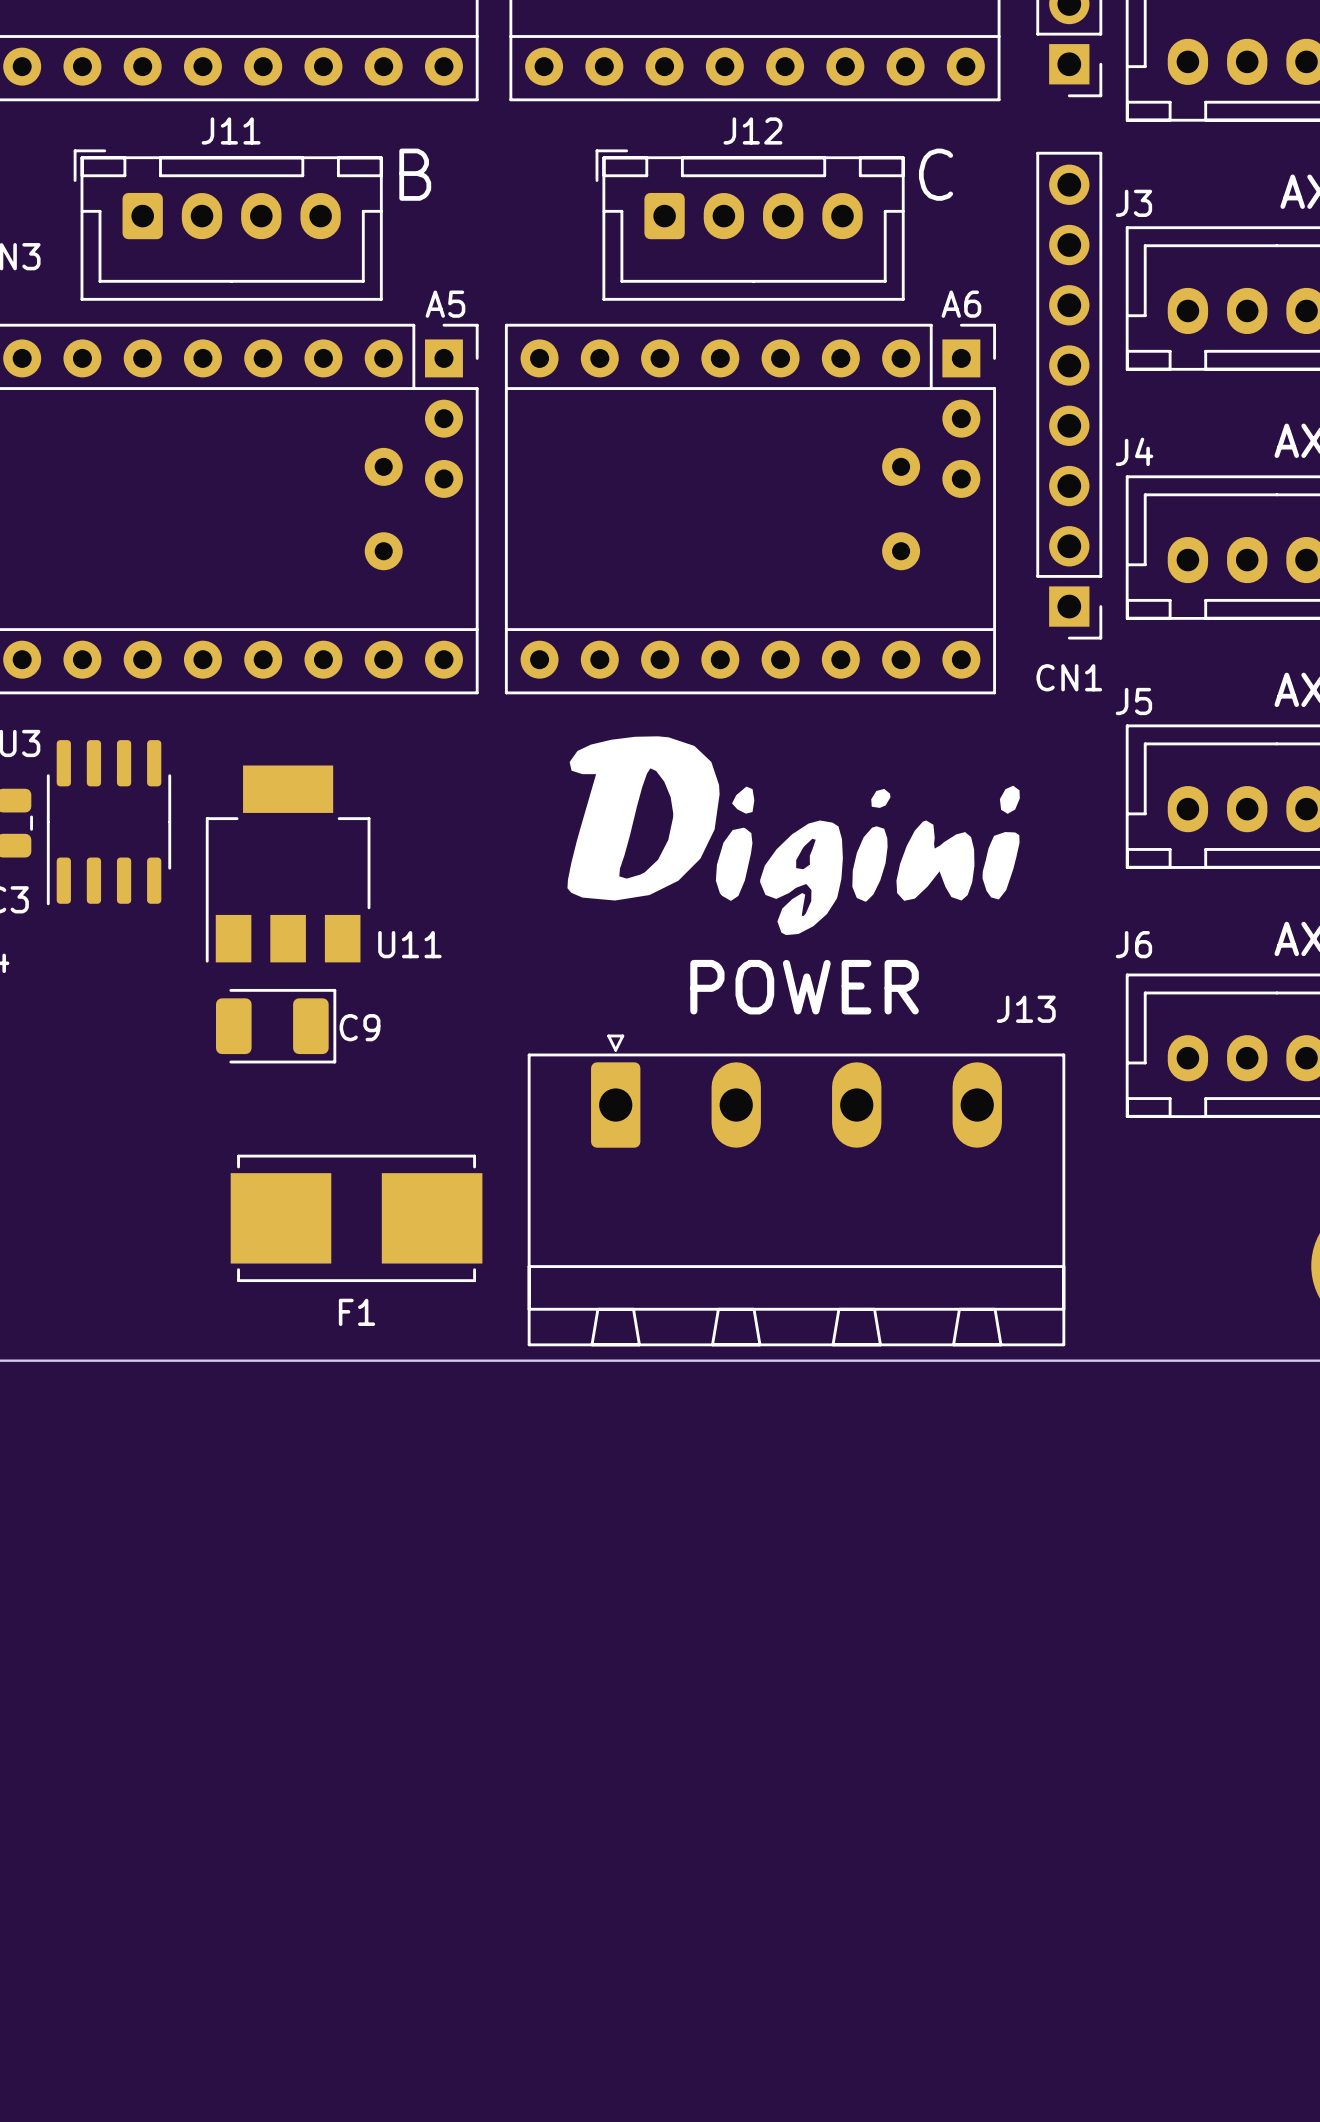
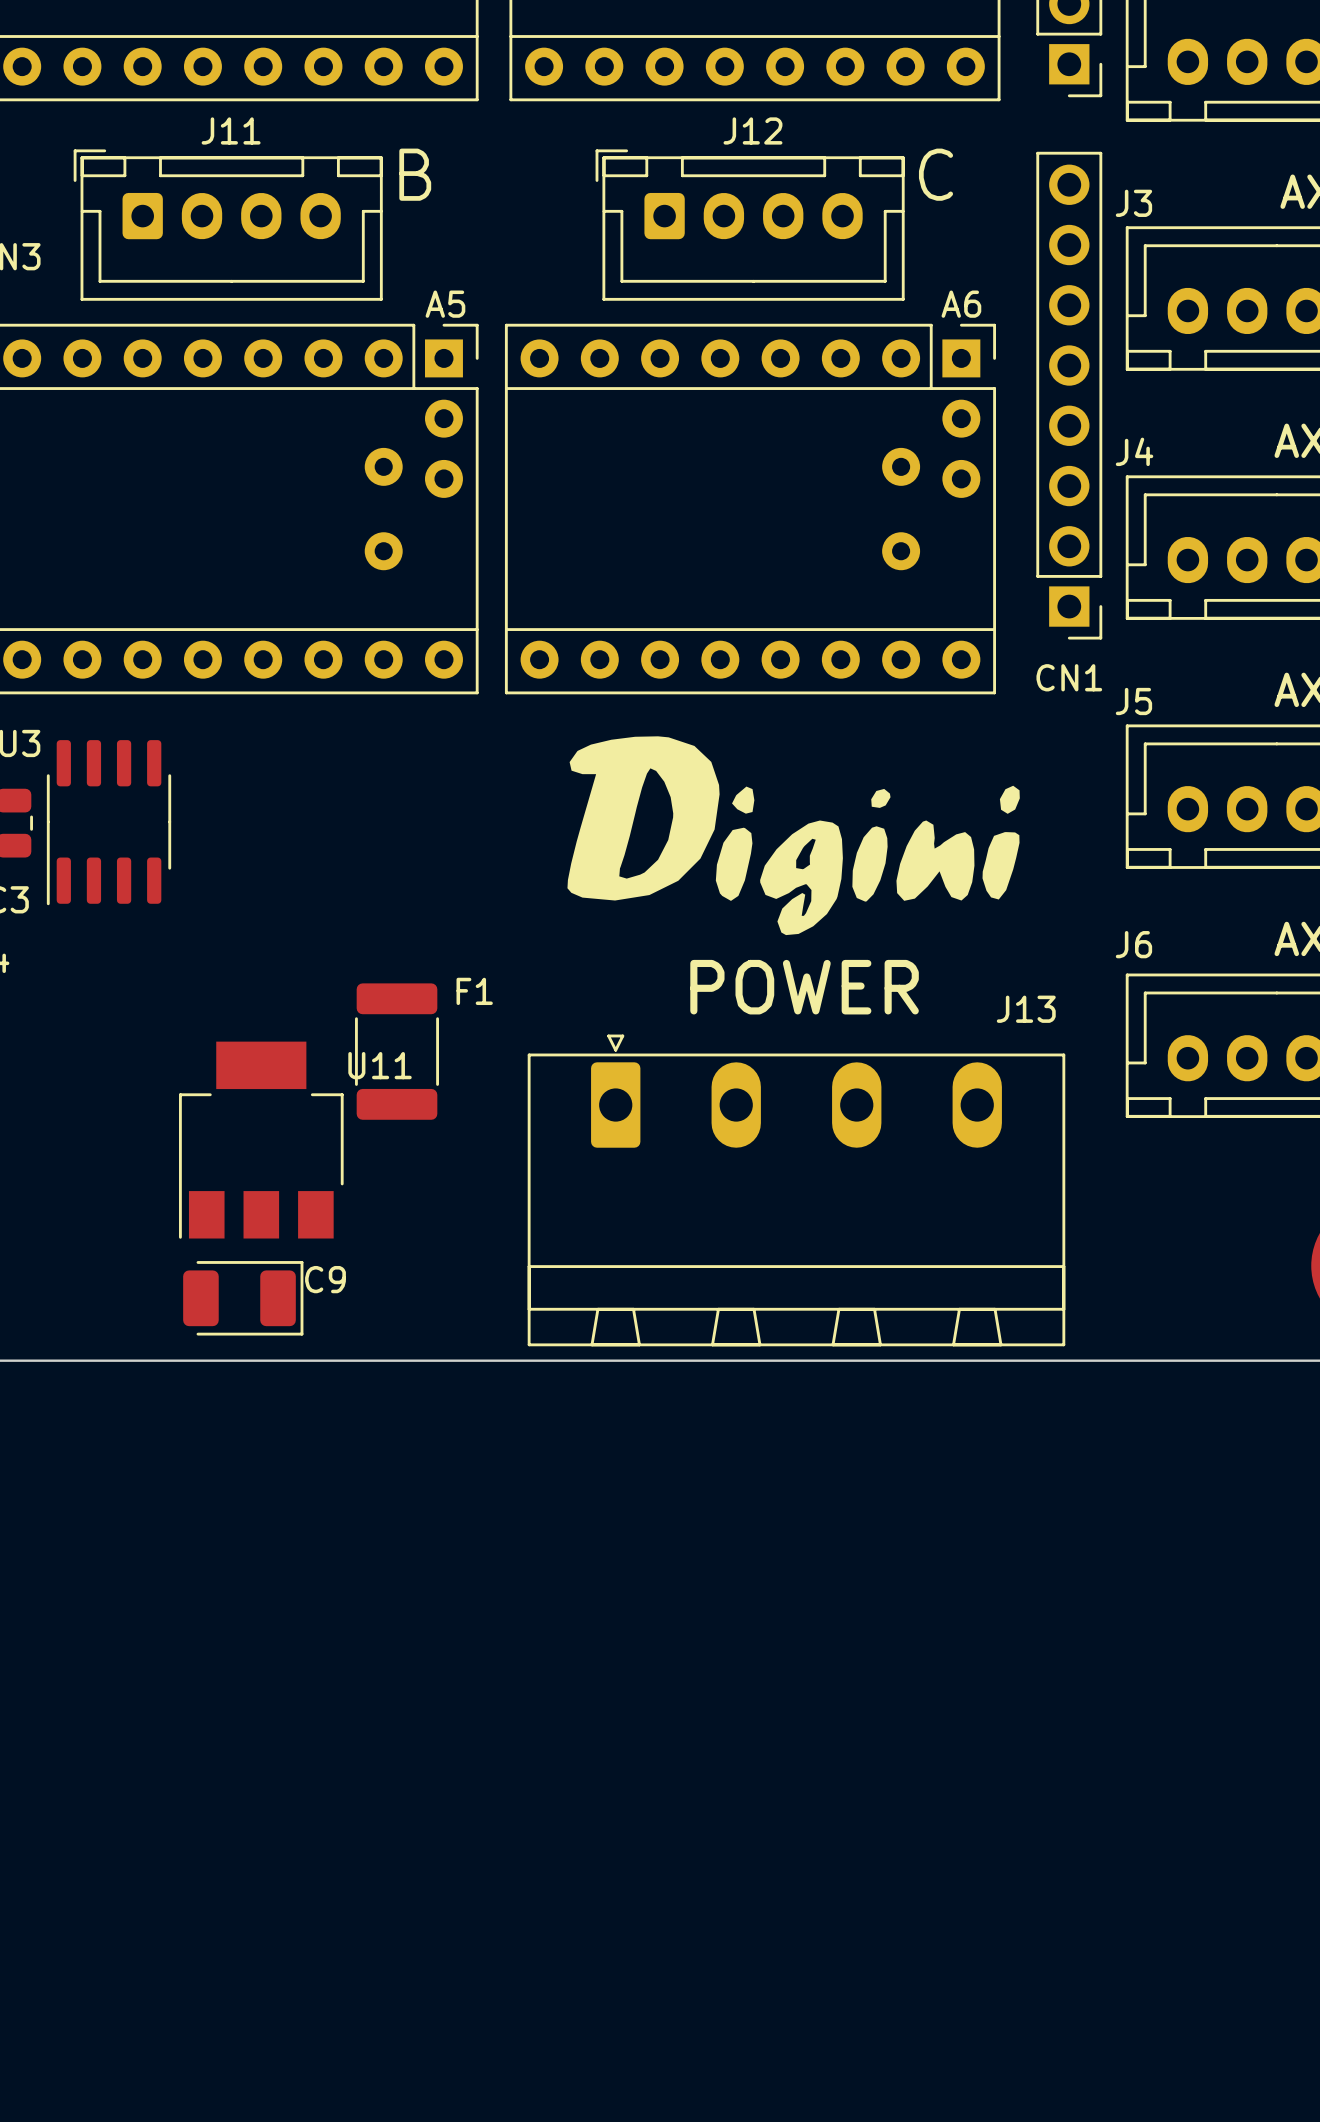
U11 position: (288, 864) -> (261, 1140)
U11 name position: U11 (409, 944) -> U11 (380, 1065)
C9 position: (276, 1026) -> (243, 1298)
C9 name position: C9 (359, 1027) -> C9 (325, 1279)
F1 footprint: [230, 1154, 483, 1283] -> [355, 983, 439, 1120]
F1 name position: F1 (357, 1312) -> F1 (474, 991)

